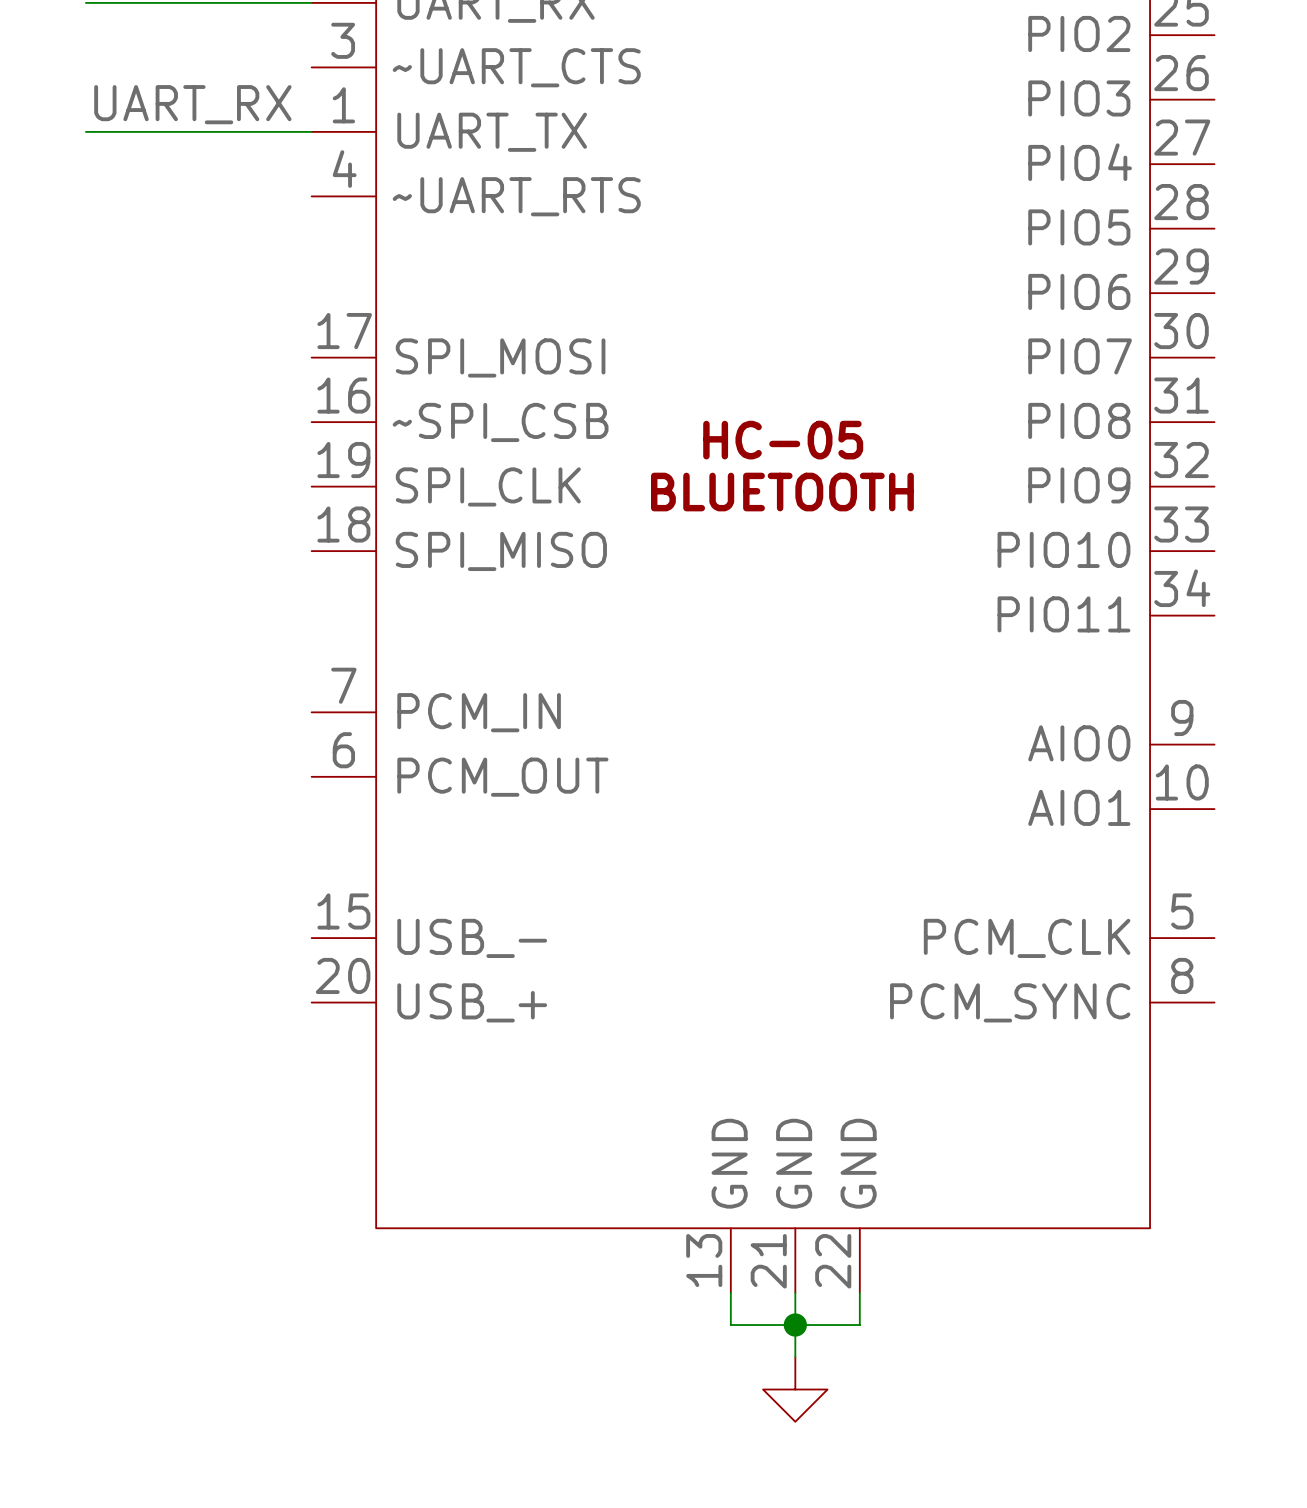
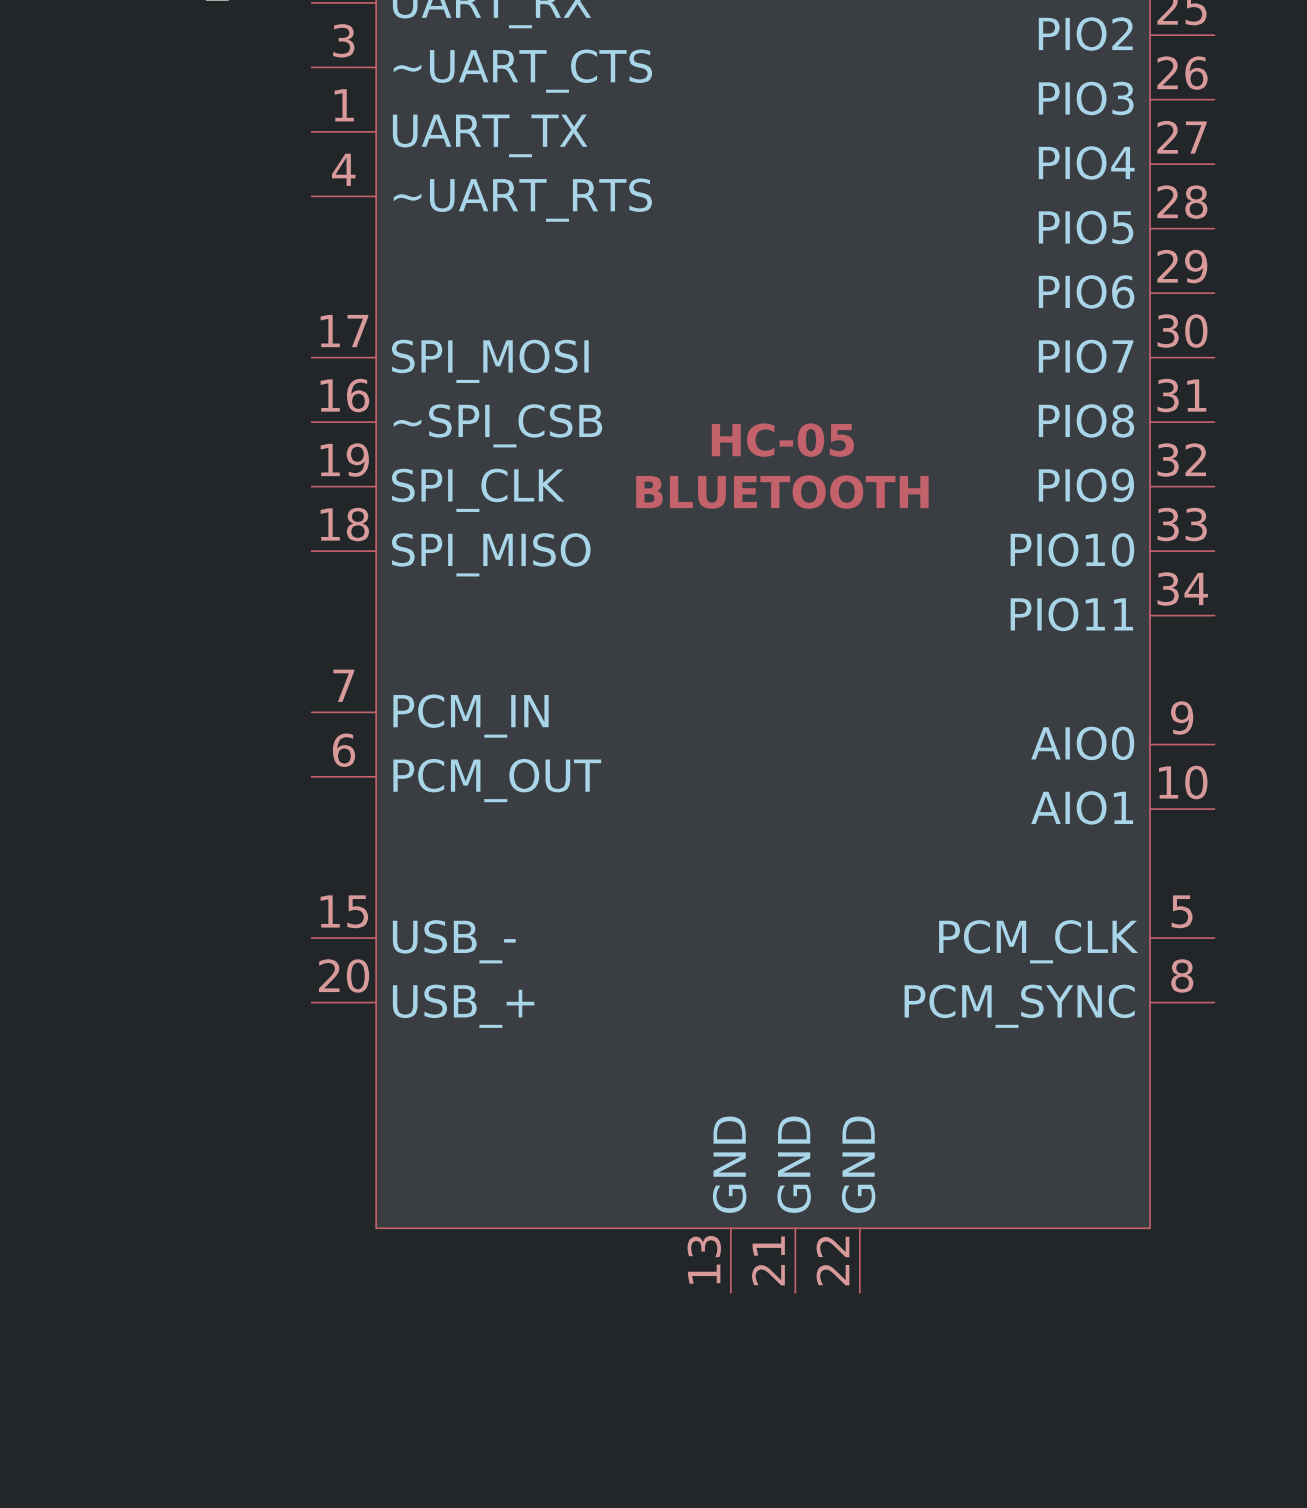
wire: (85, 2) (311, 2) -> none
label: UART_RX (192, 104) -> none
wire: (85, 131) (311, 131) -> none
wire: (730, 1292) (730, 1325) (859, 1325) (859, 1292) -> none
wire: (795, 1292) (795, 1357) -> none
junction: (795, 1325) -> none
power symbol: (795, 1389) -> none

